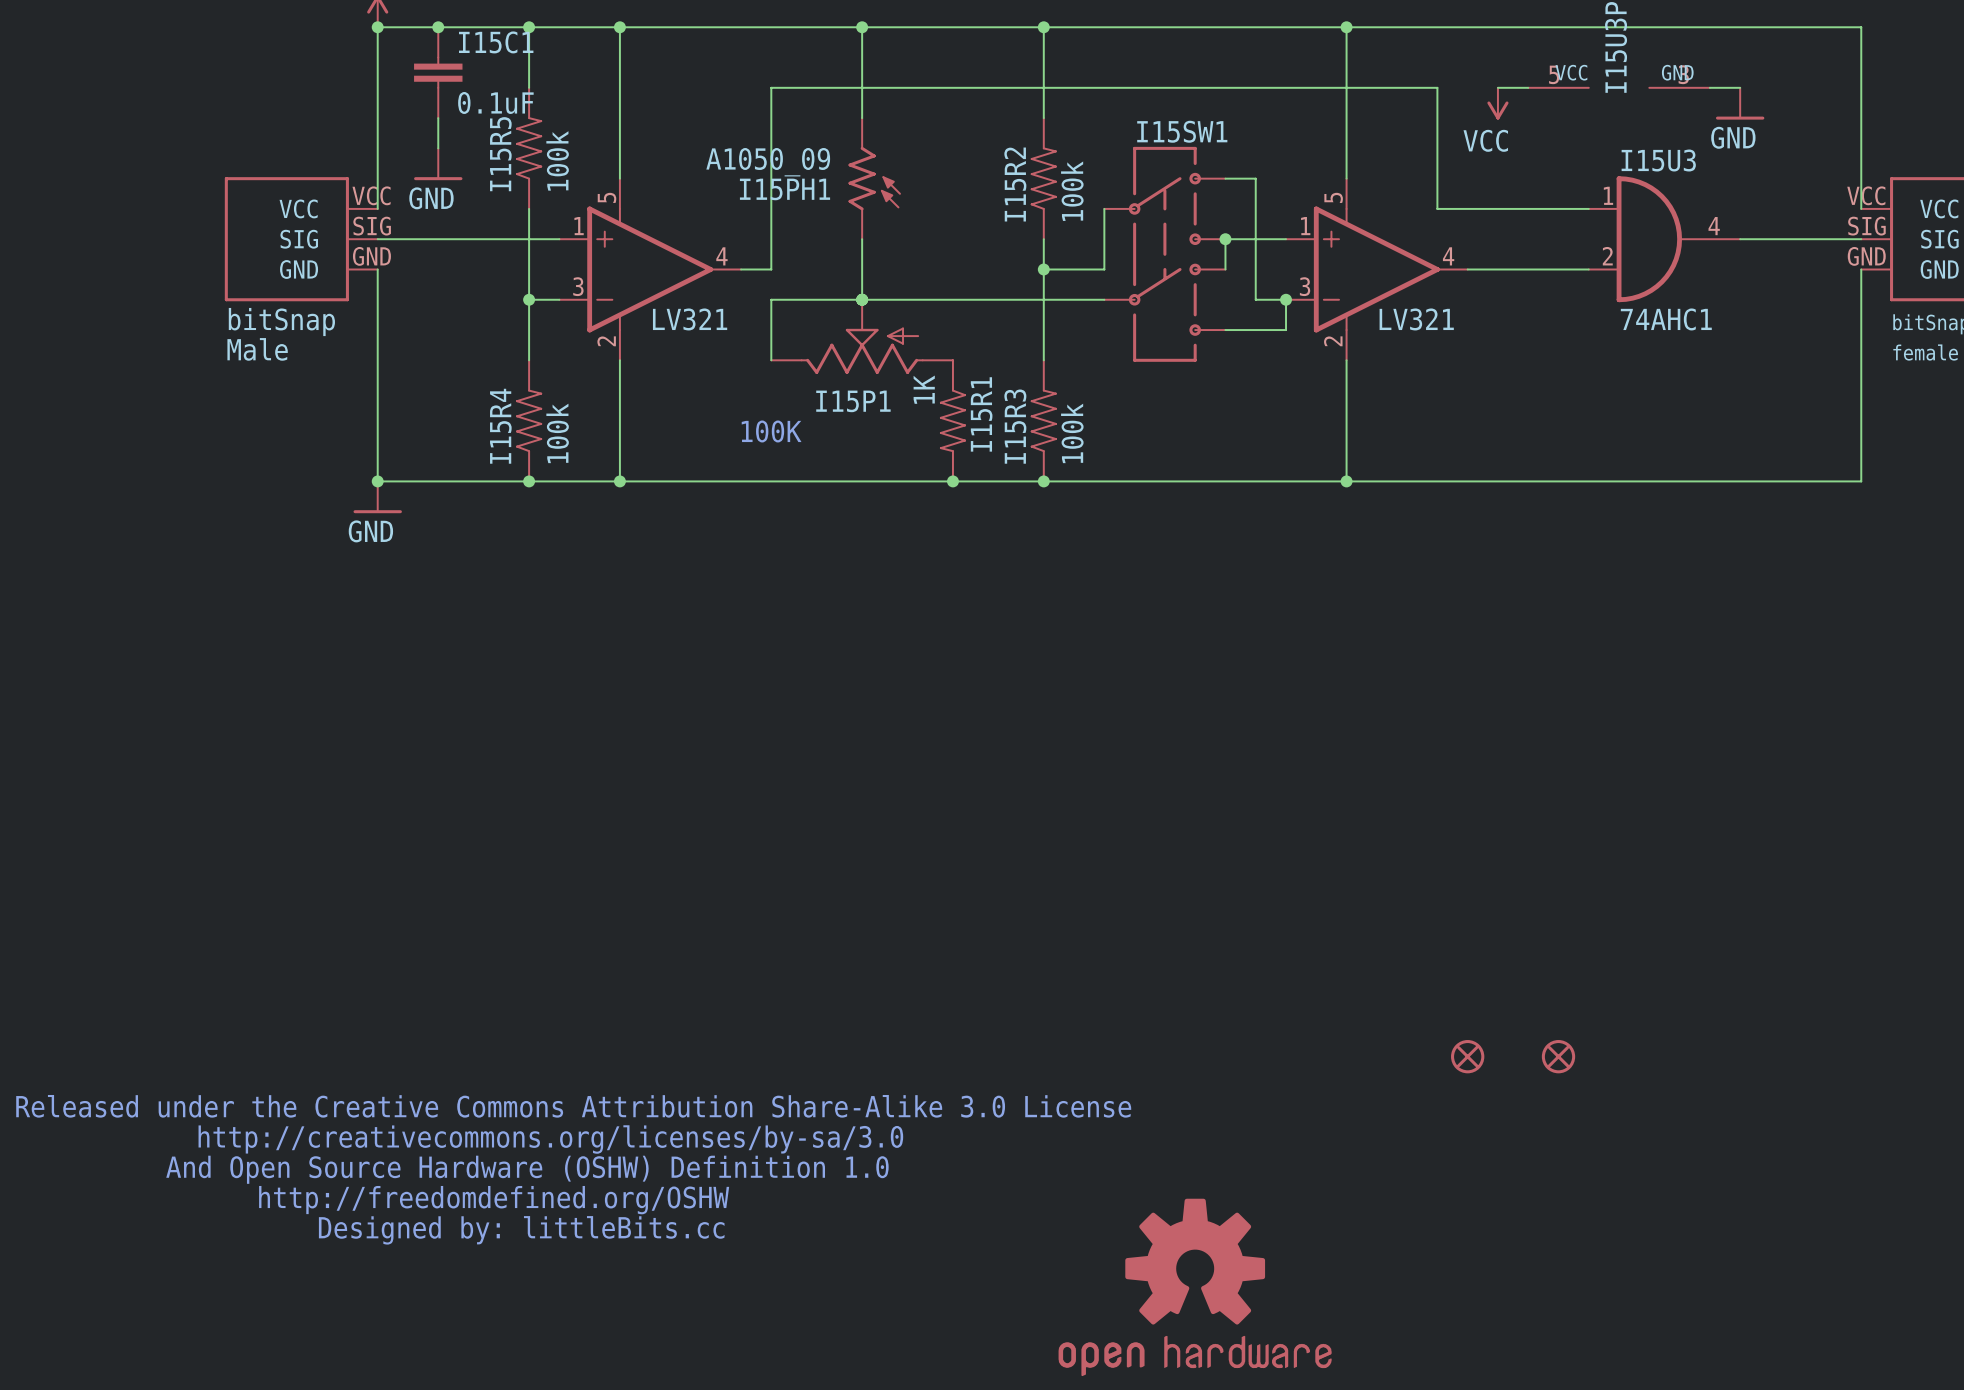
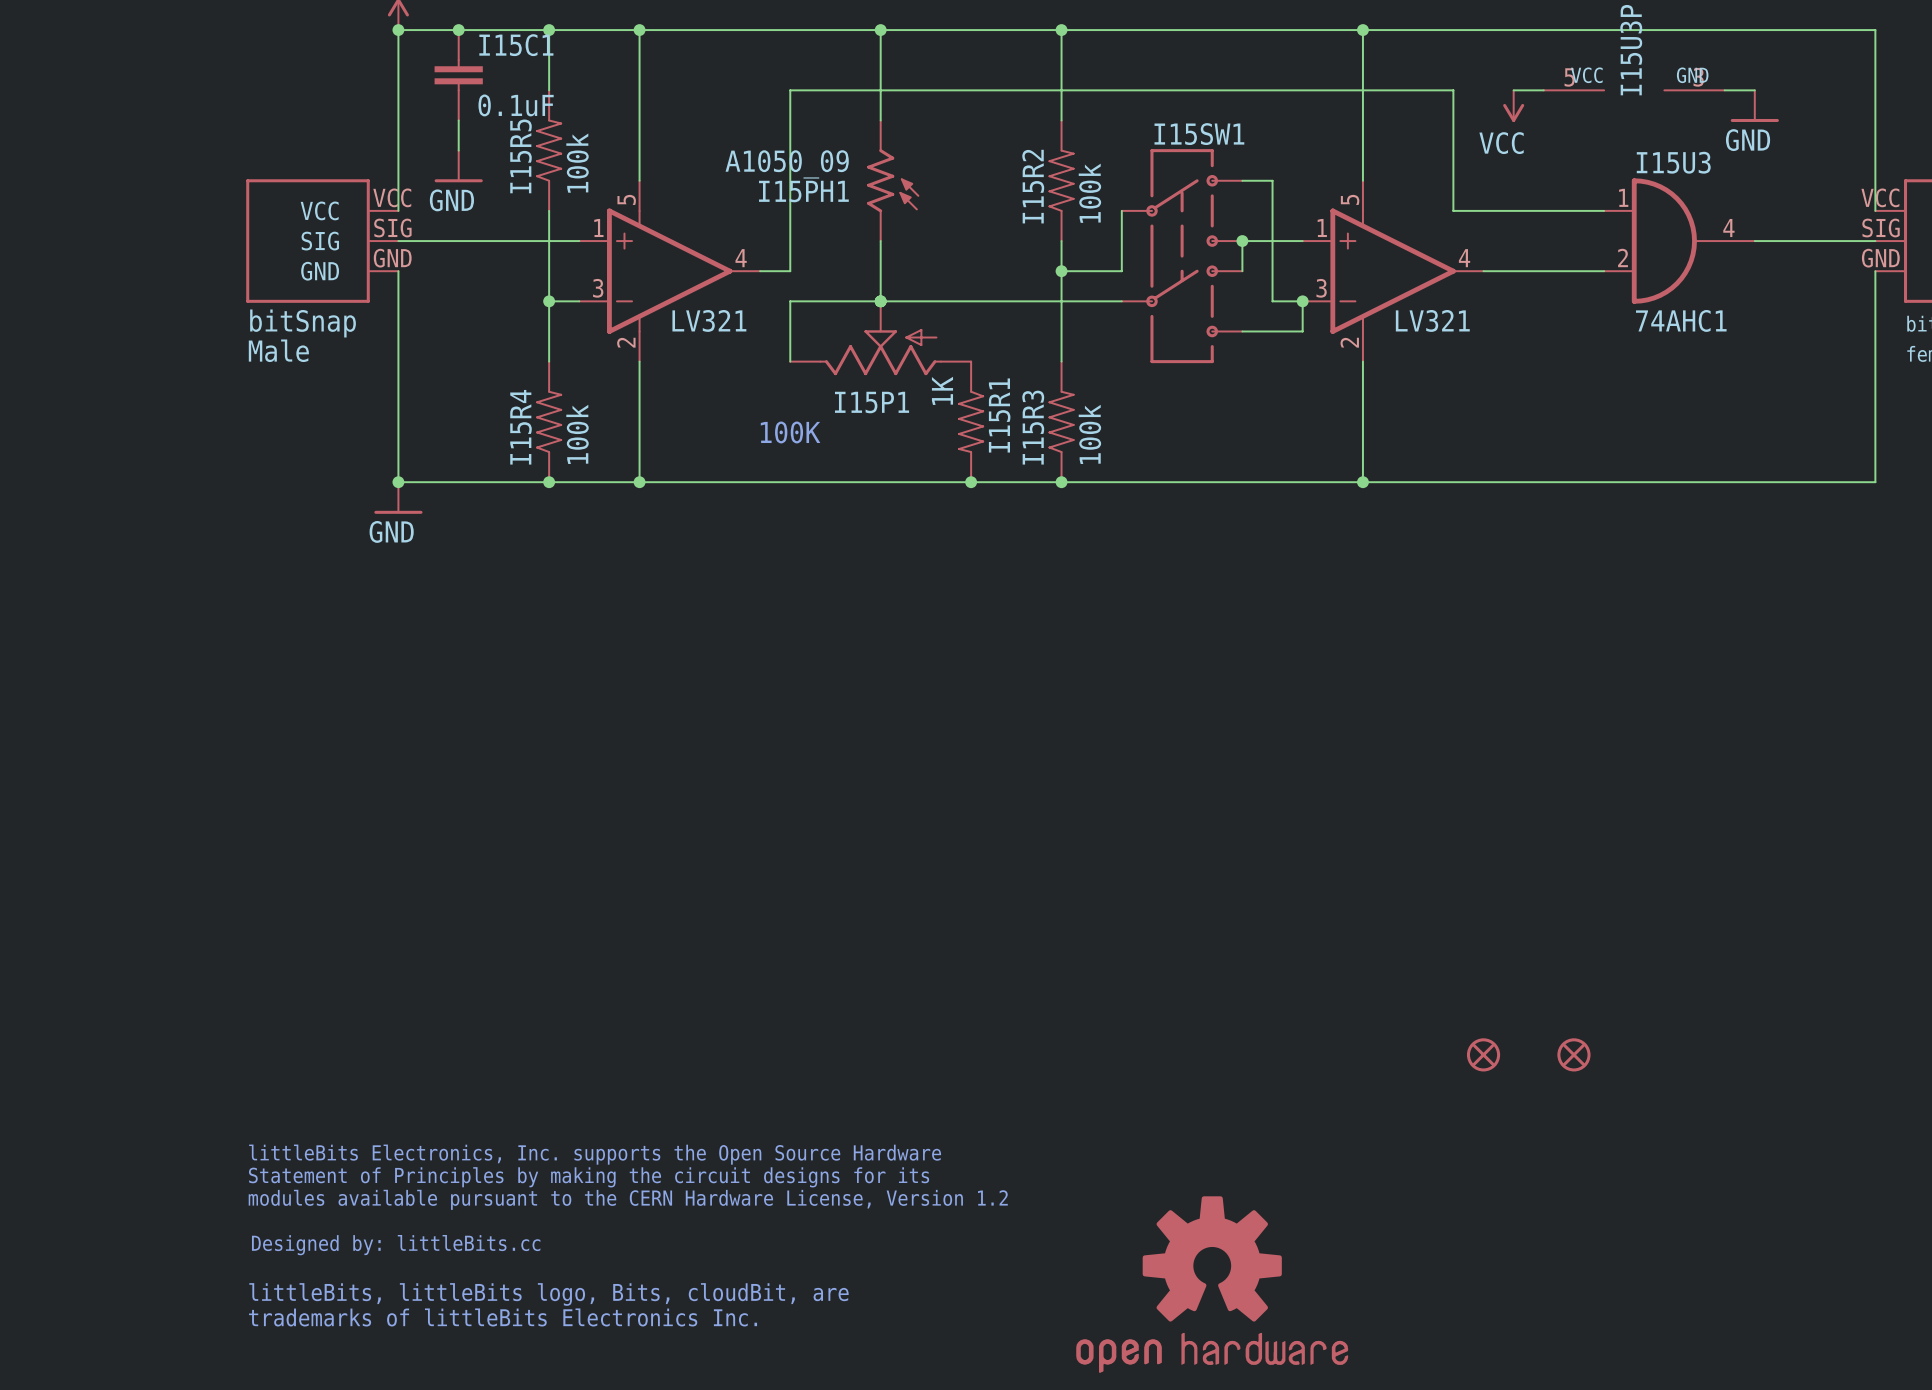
part: (573, 1169) -> none
part: none -> (628, 1235)

